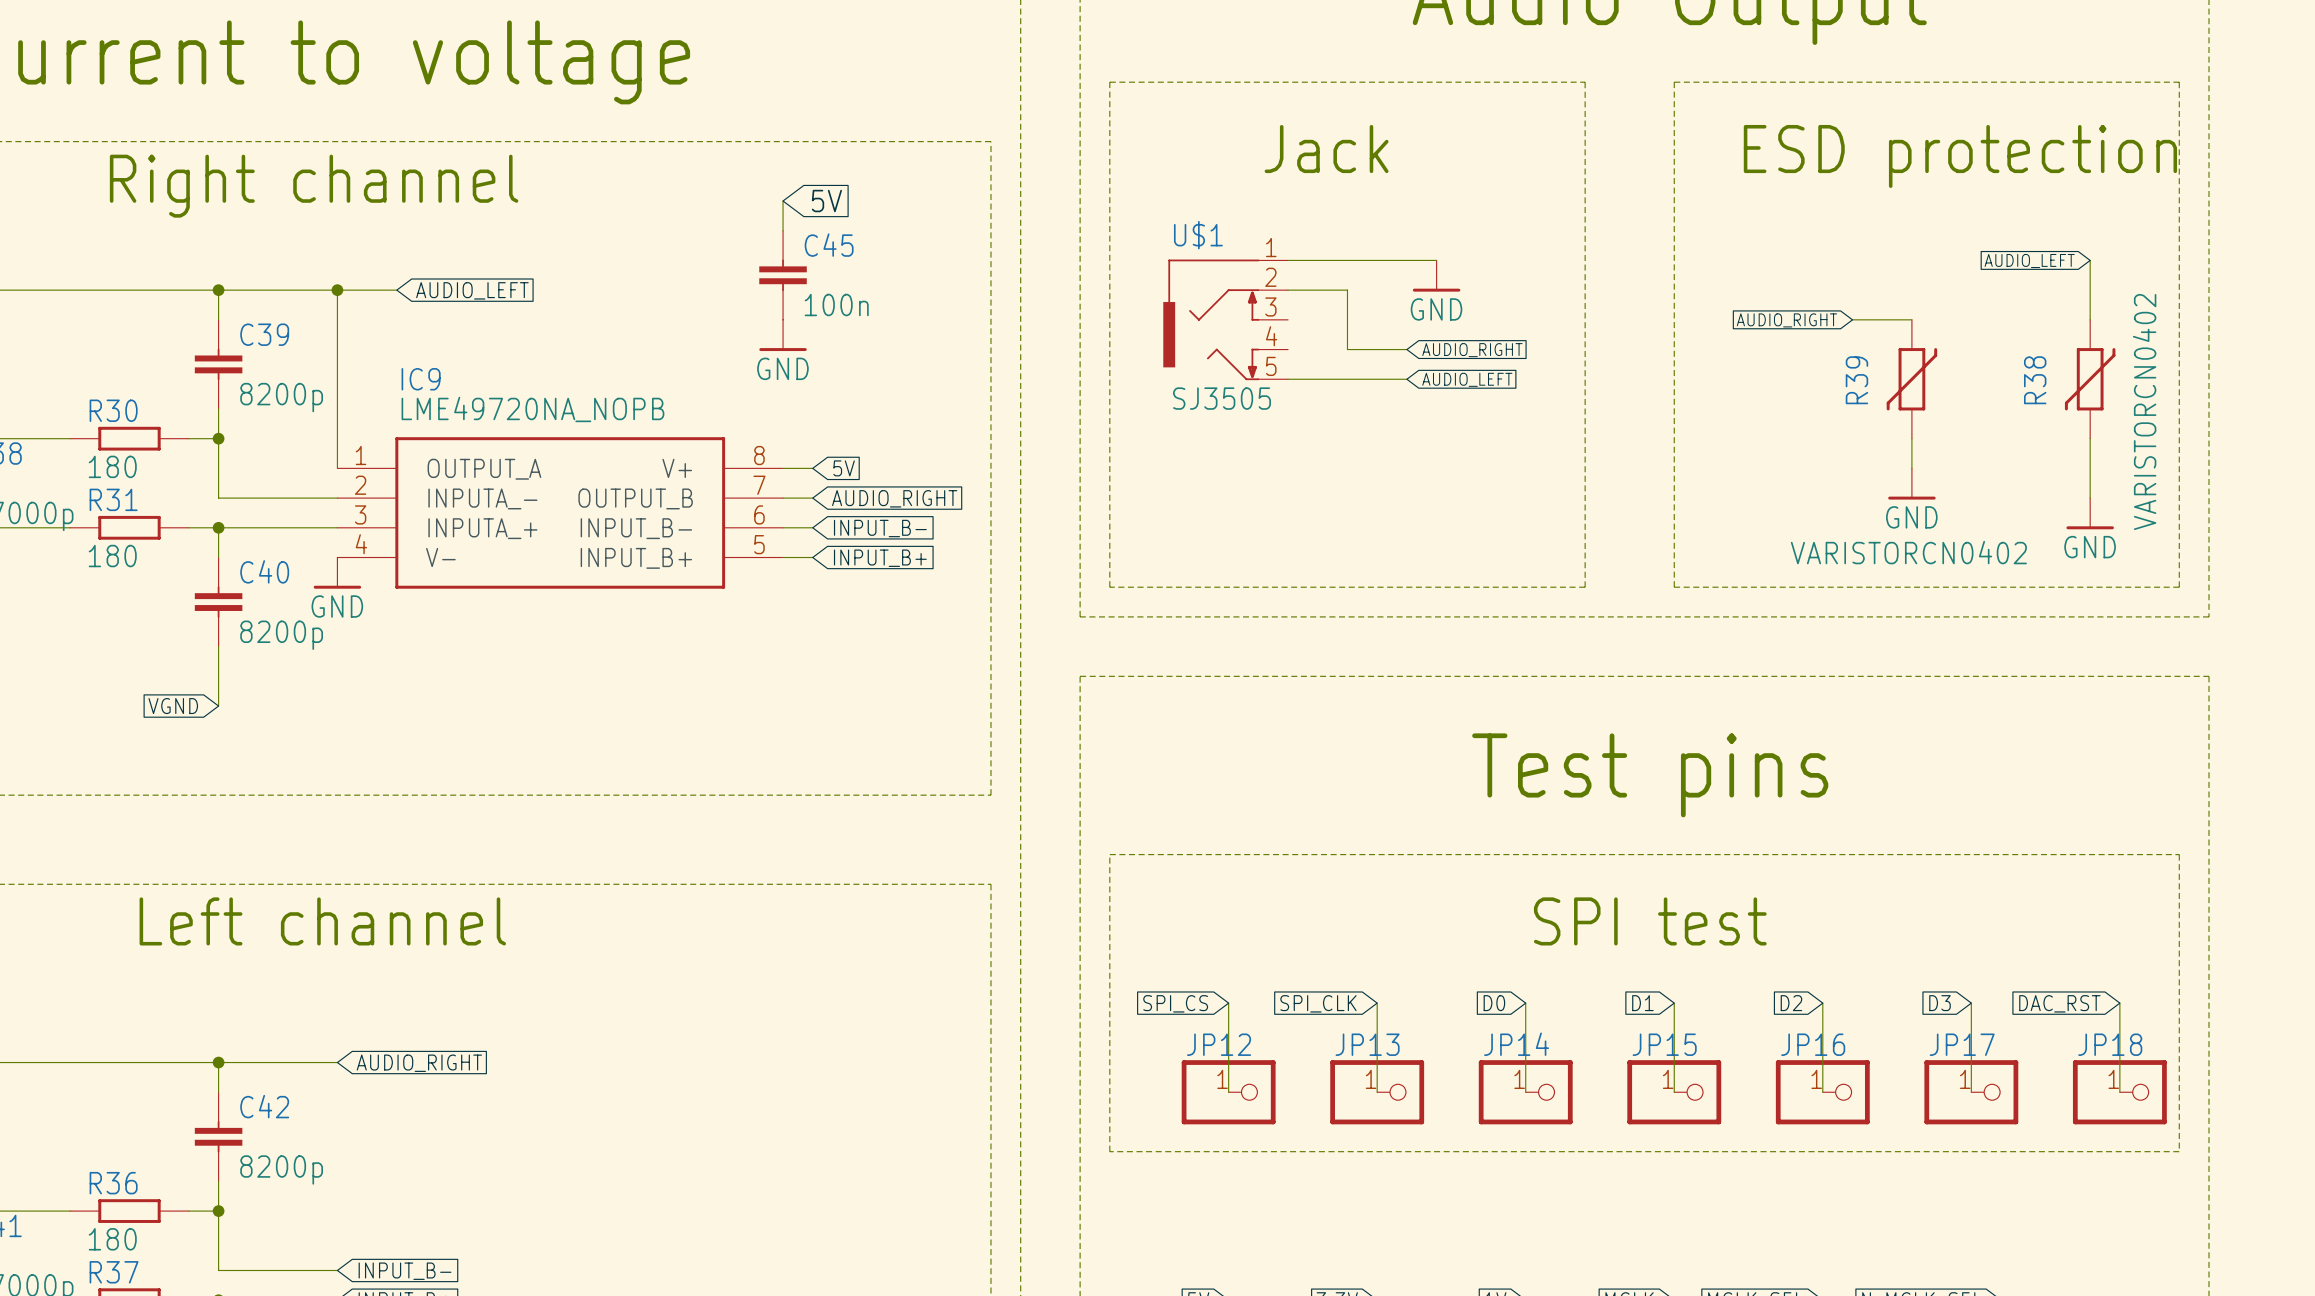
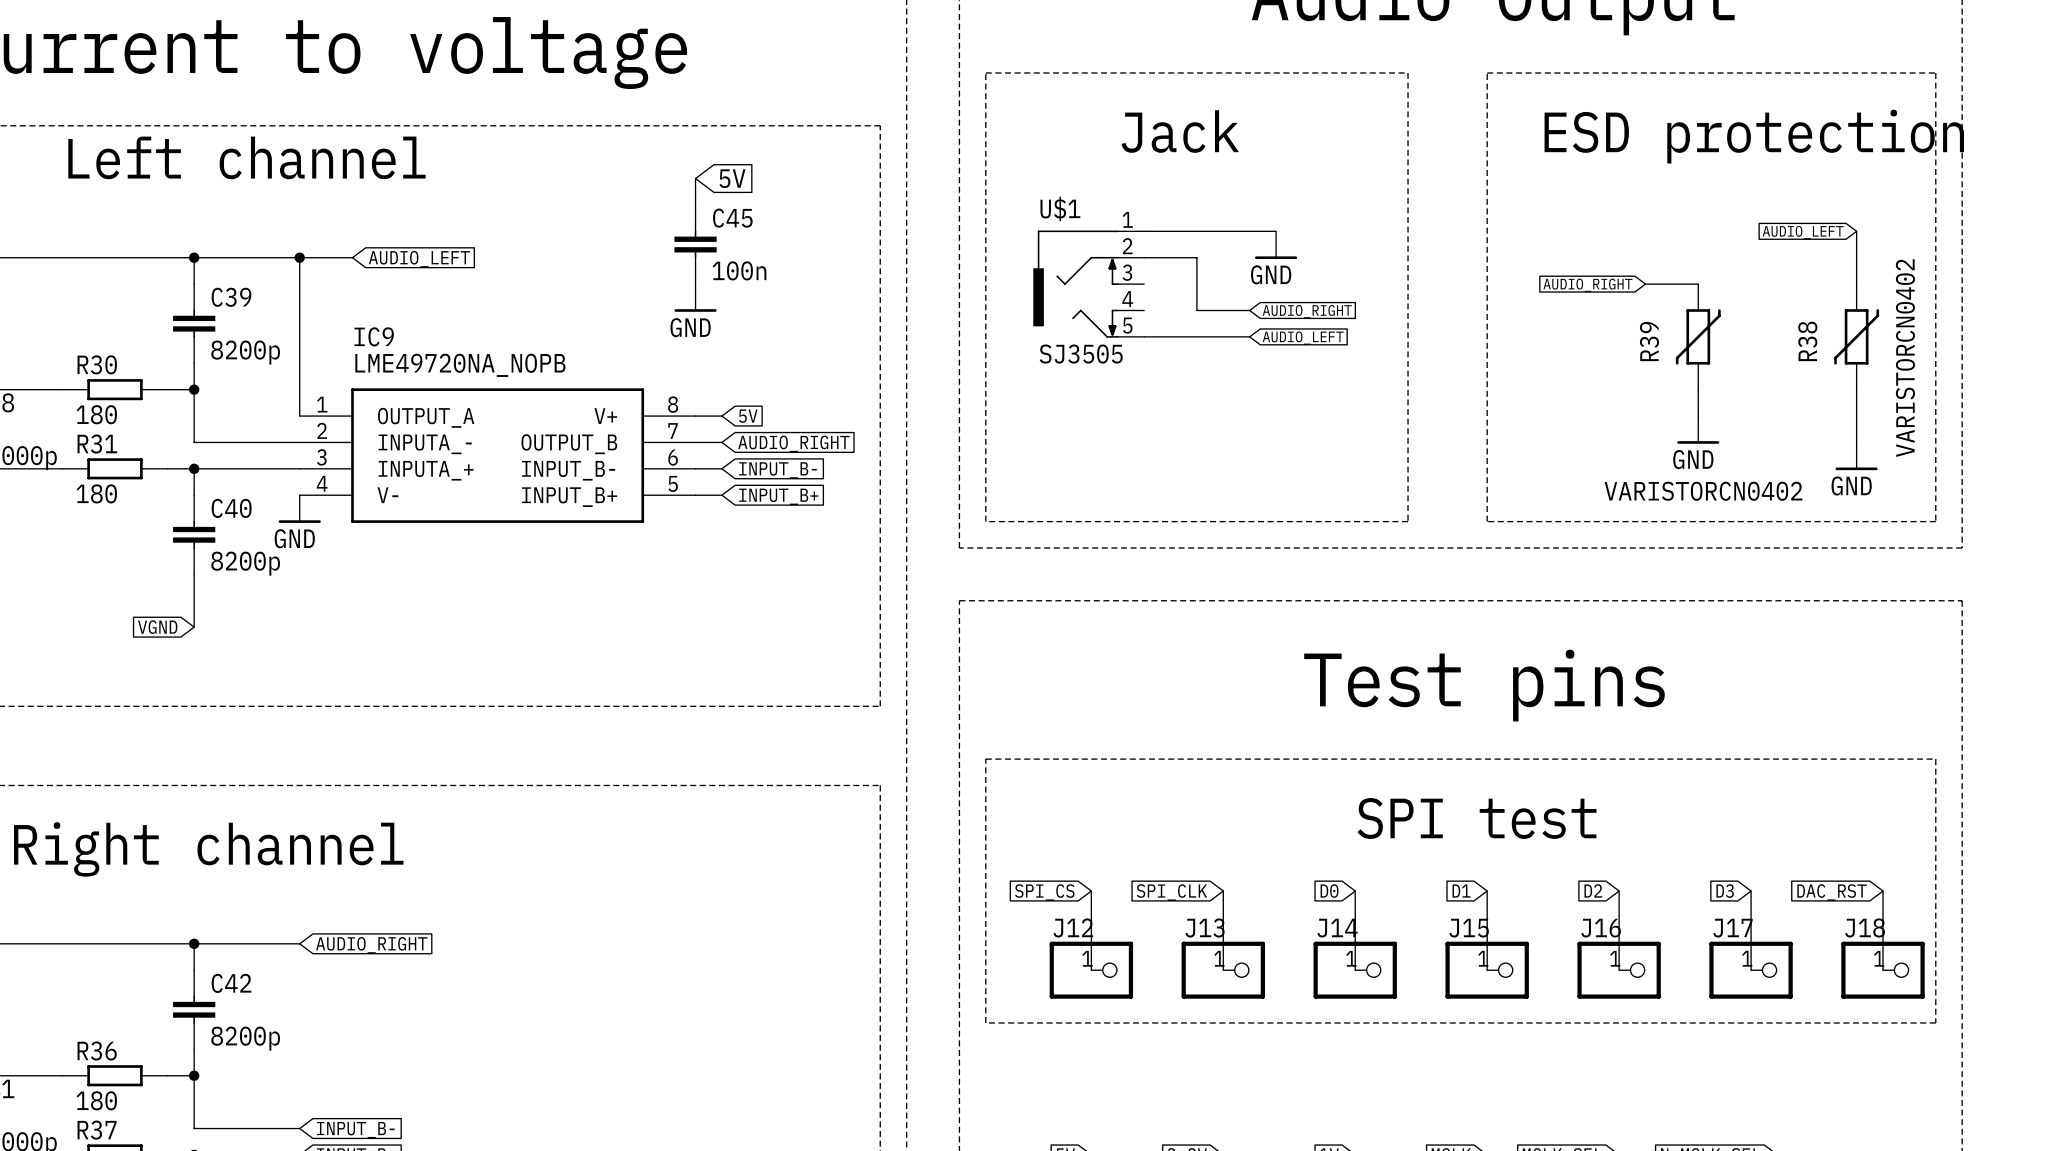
text: Right channel (314, 186) -> Left channel (246, 157)
text: Left channel (322, 921) -> Right channel (208, 849)
JP12 name: JP12 (1219, 1044) -> J12 (1073, 927)
JP13 name: JP13 (1367, 1044) -> J13 (1205, 927)
JP14 name: JP14 (1516, 1044) -> J14 (1337, 928)
JP15 name: JP15 (1664, 1044) -> J15 (1469, 928)
JP16 name: JP16 (1813, 1044) -> J16 (1601, 928)
JP17 name: JP17 (1962, 1044) -> J17 (1732, 928)
JP18 name: JP18 (2110, 1044) -> J18 (1865, 927)

